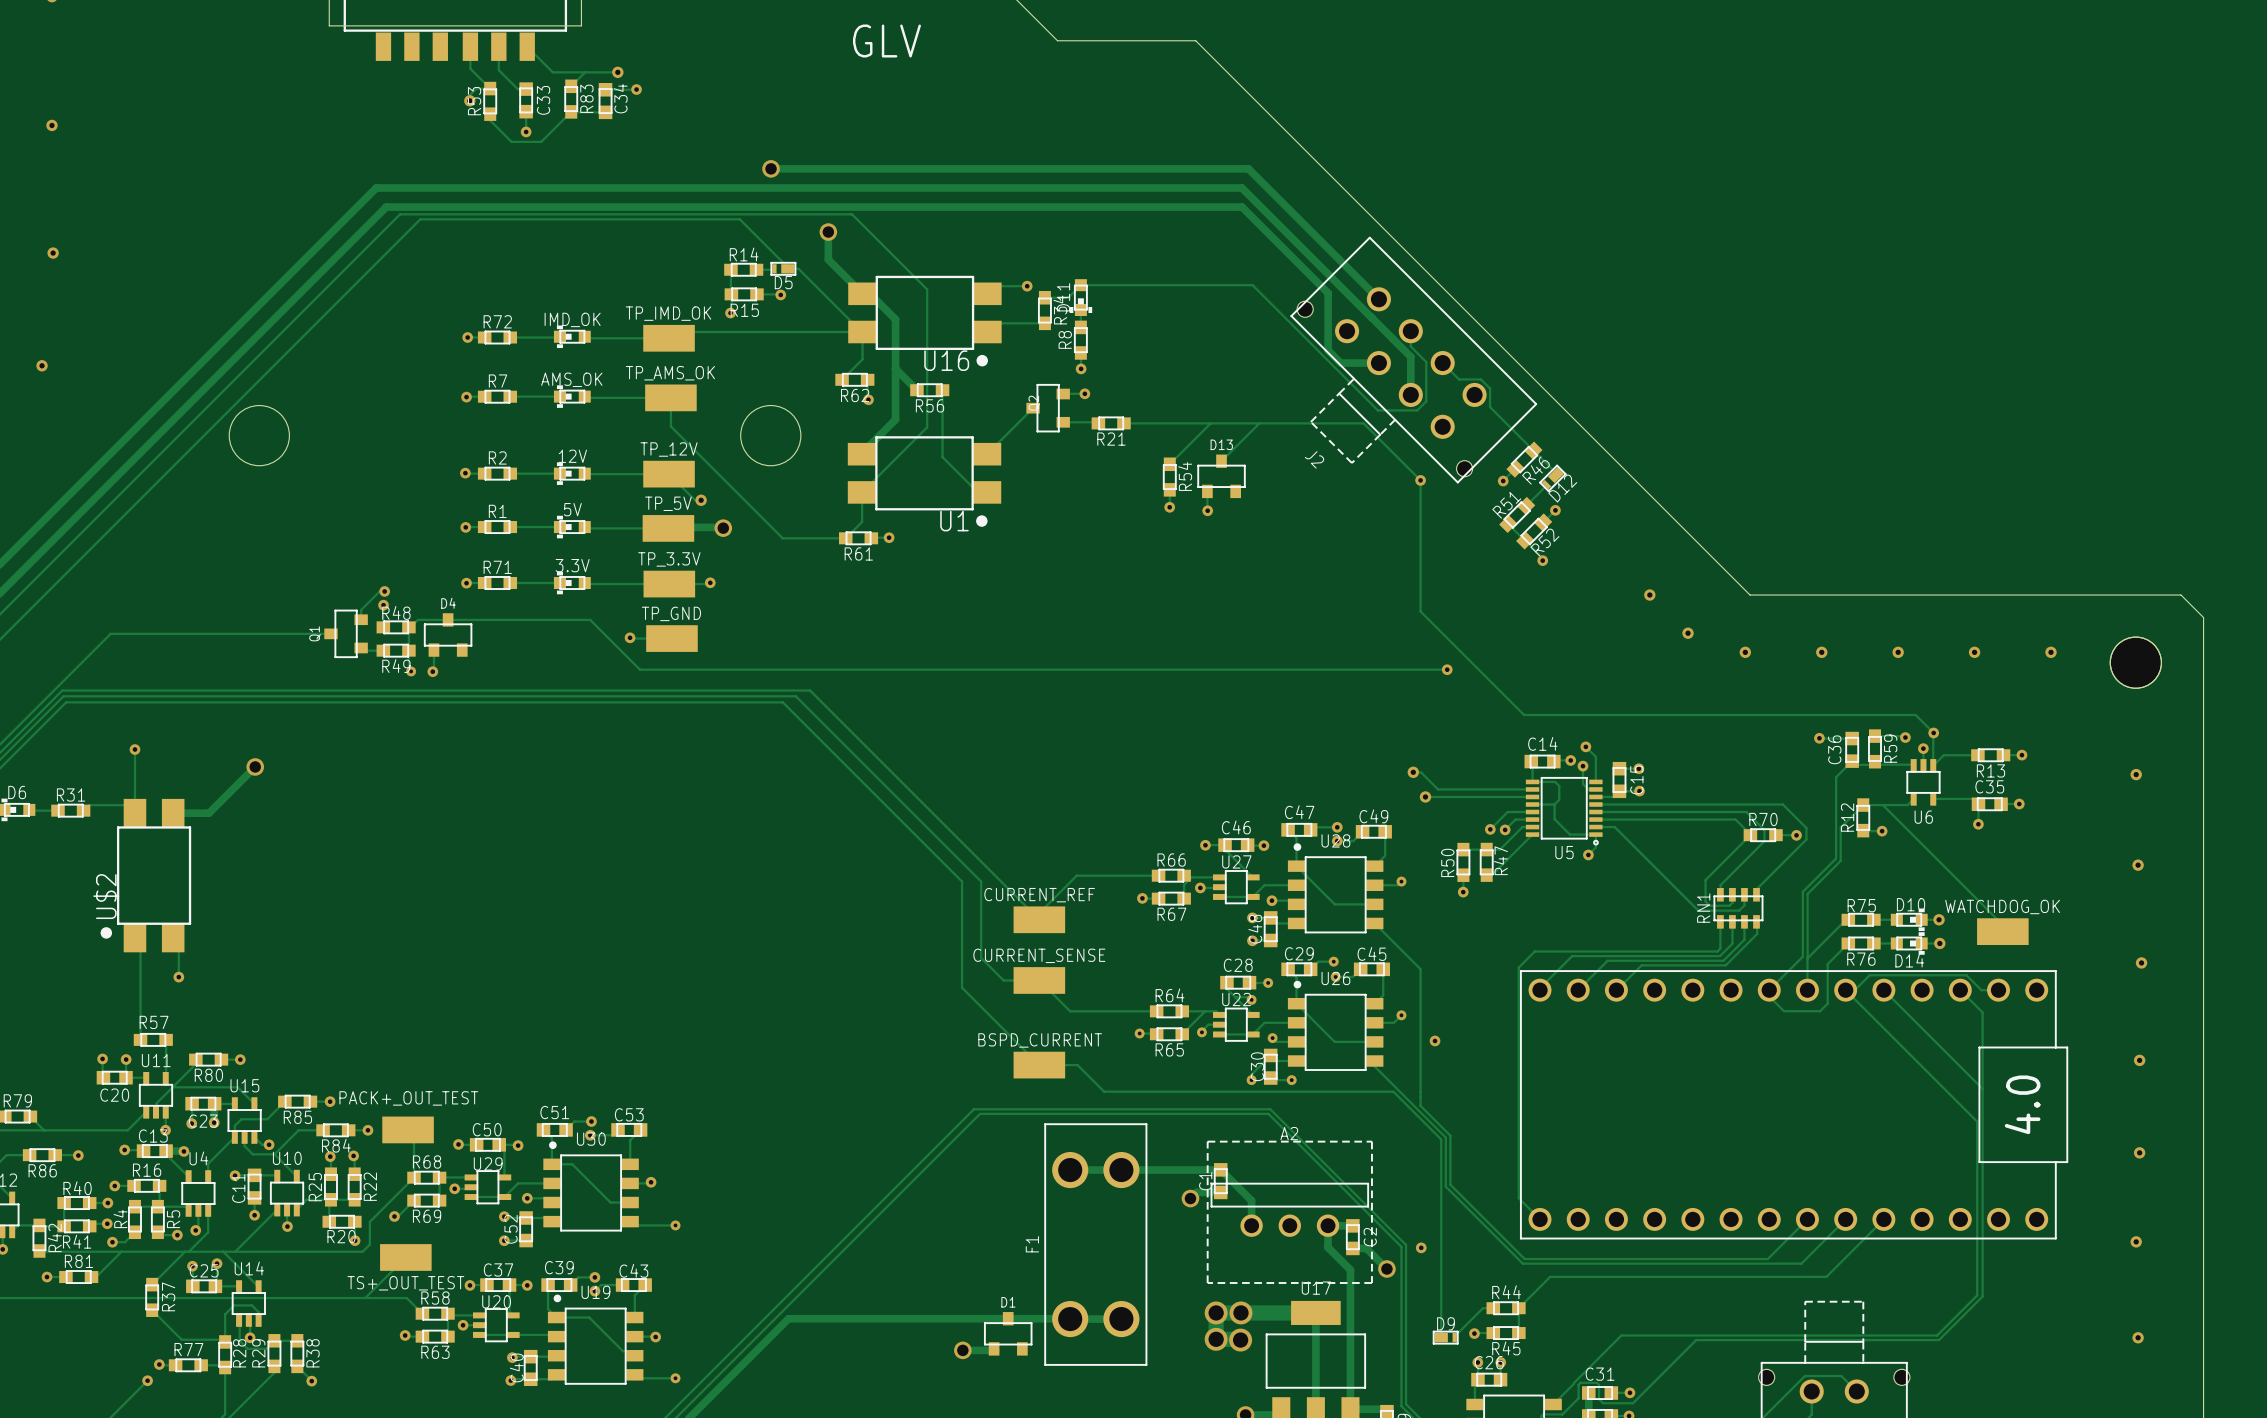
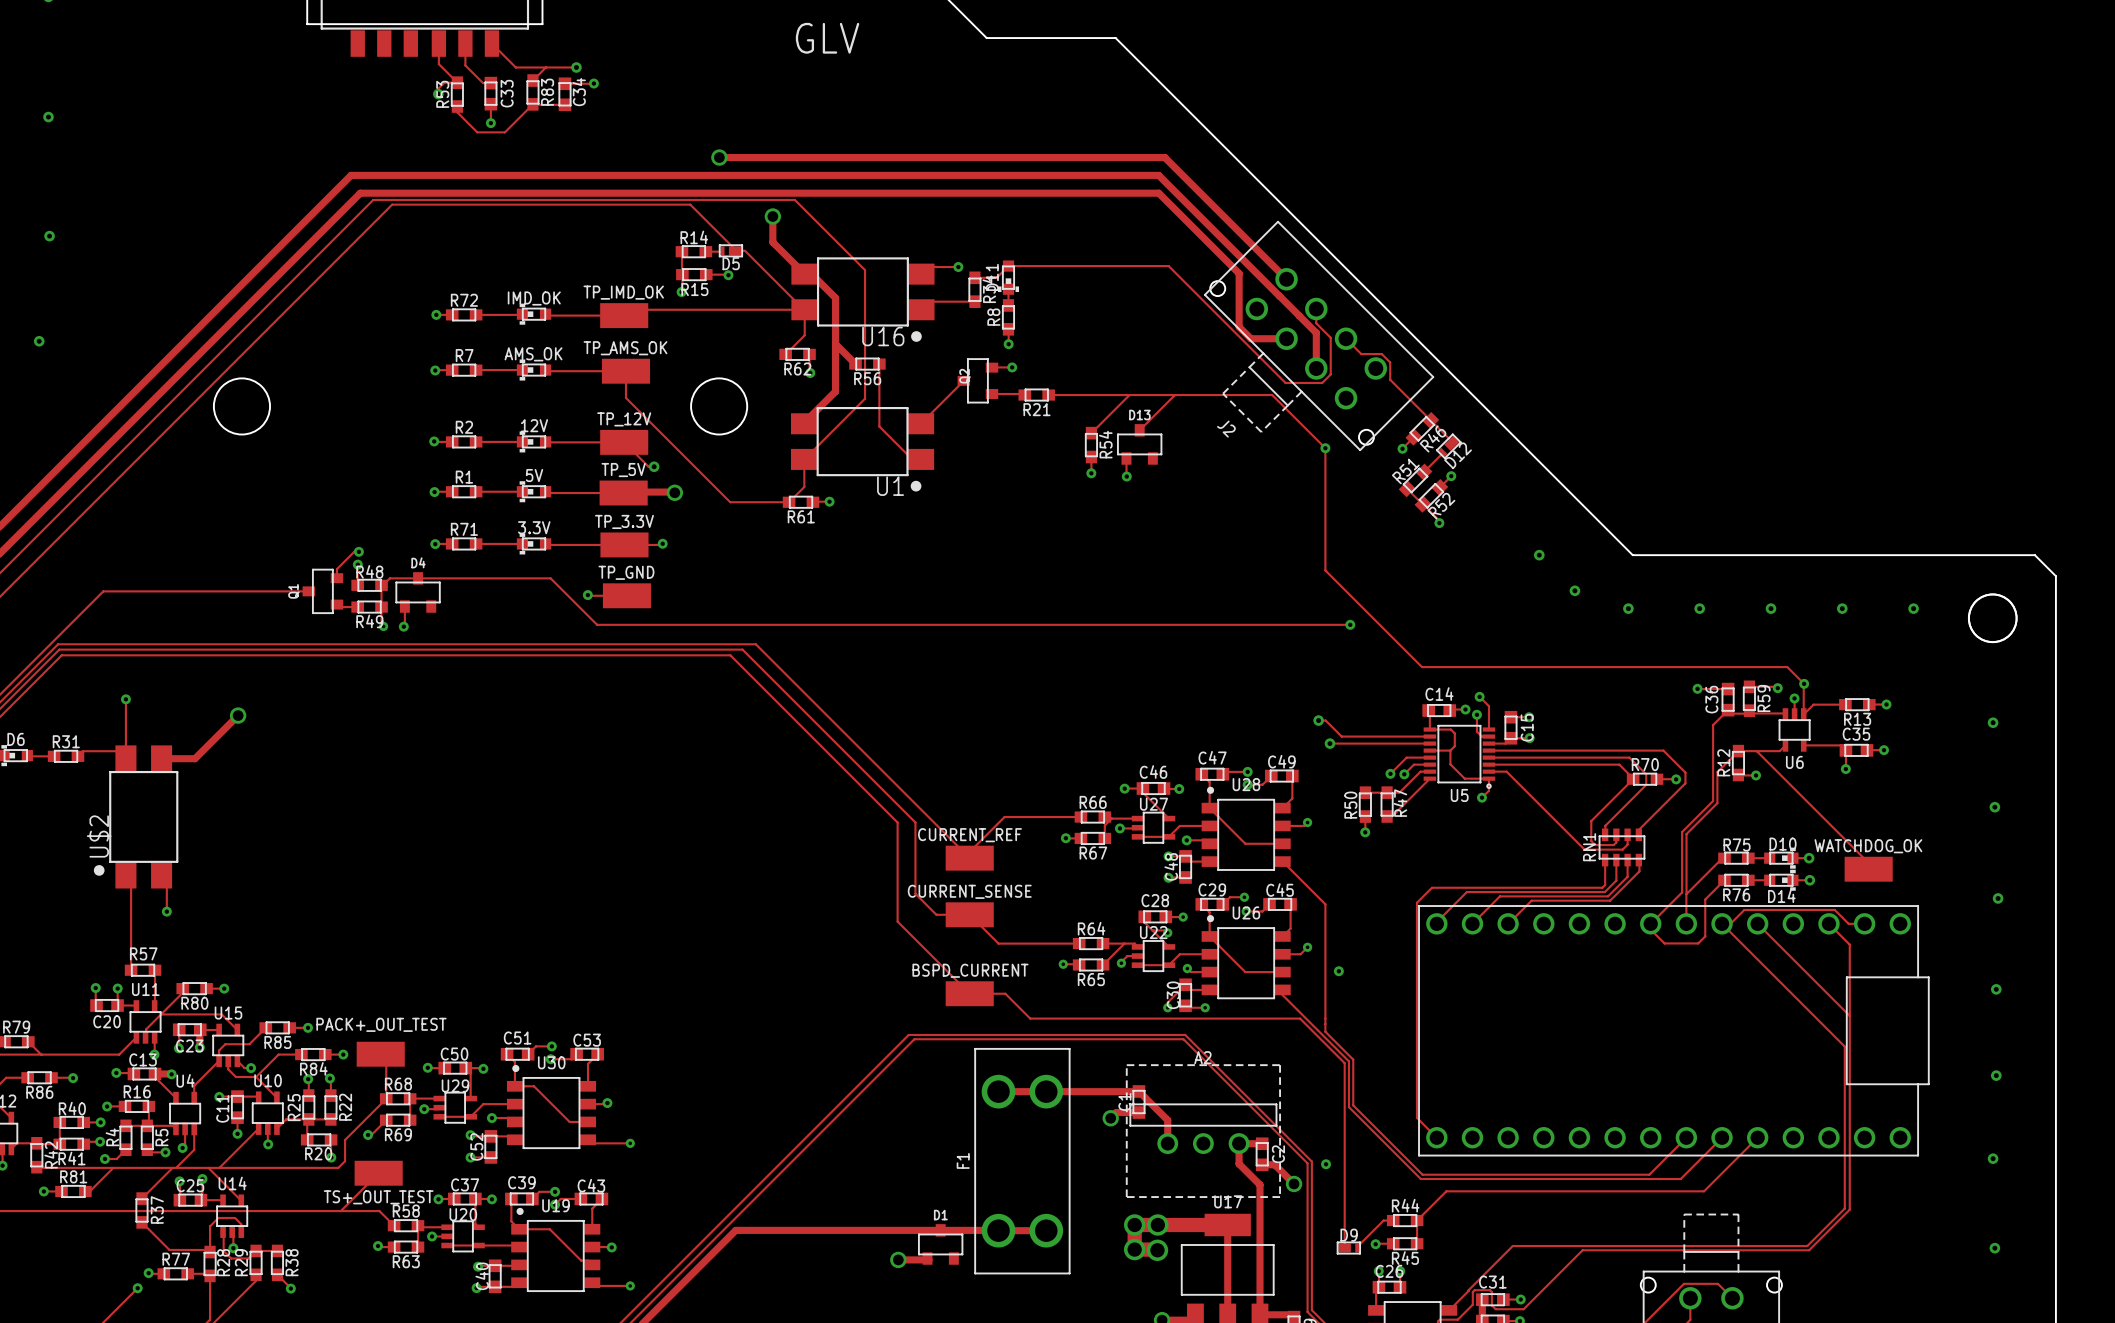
part text: 4.0 (2022, 1104) -> none

